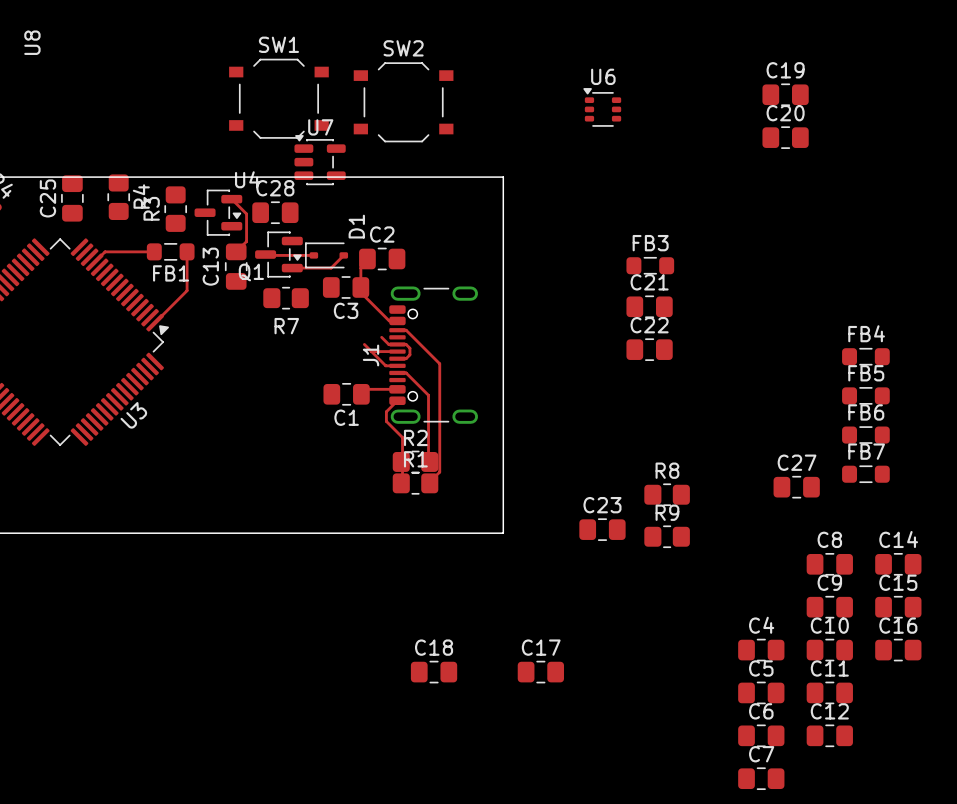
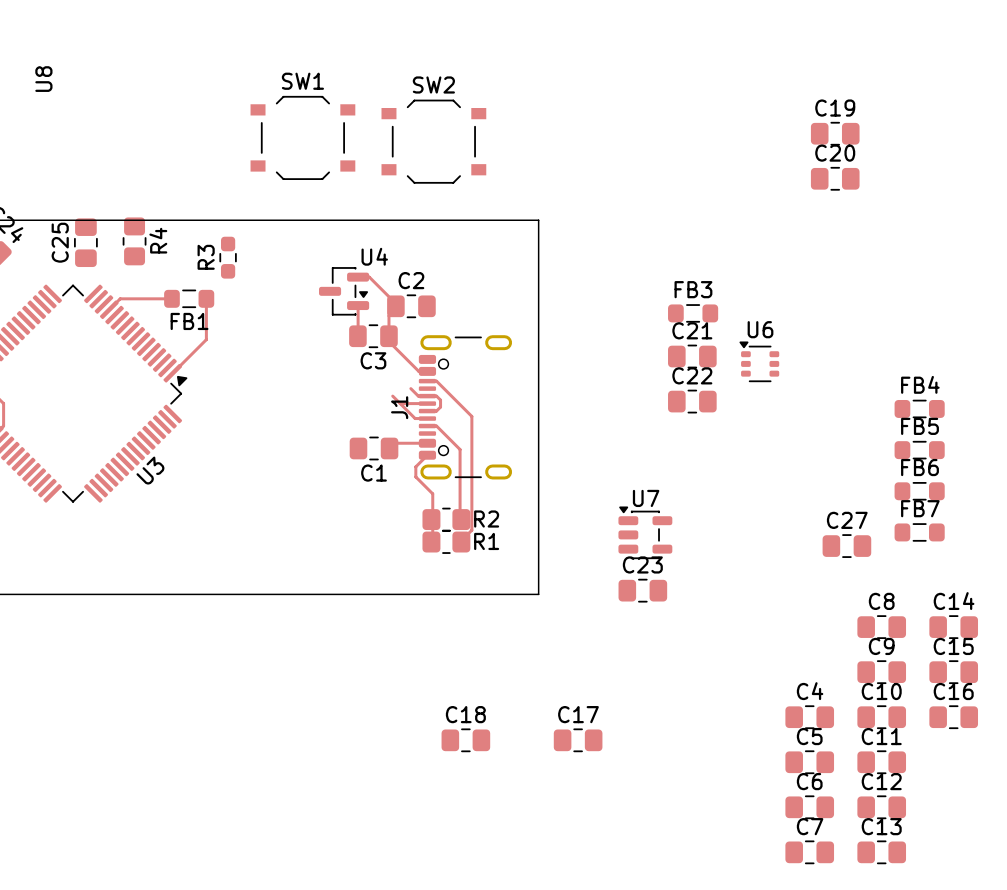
U6 position: (602, 107) -> (759, 361)
U7 position: (320, 160) -> (645, 532)
R3 footprint: [164, 186, 188, 232] -> [219, 236, 237, 279]
top track: (231, 199) (246, 213) (246, 241) (236, 251) -> none
U4 position: (218, 212) -> (344, 291)
C28: (275, 212) -> none
top track: none -> (358, 277) (369, 277) (398, 306)
top track: (265, 254) (313, 255) -> none
Q1: (278, 254) -> none
D1: (326, 255) -> none
top track: (343, 255) (331, 268) (292, 268) -> none
top track: none -> (358, 305) (358, 336)
C13 rotation: 0° (236, 266) -> 90° clockwise (881, 852)
C13 position: (236, 266) -> (881, 852)
R7: (286, 298) -> none
R2 name position: R2 (415, 437) -> R2 (486, 519)
R1 name position: R1 (415, 459) -> R1 (486, 541)
R8: (667, 494) -> none
R9: (667, 536) -> none

